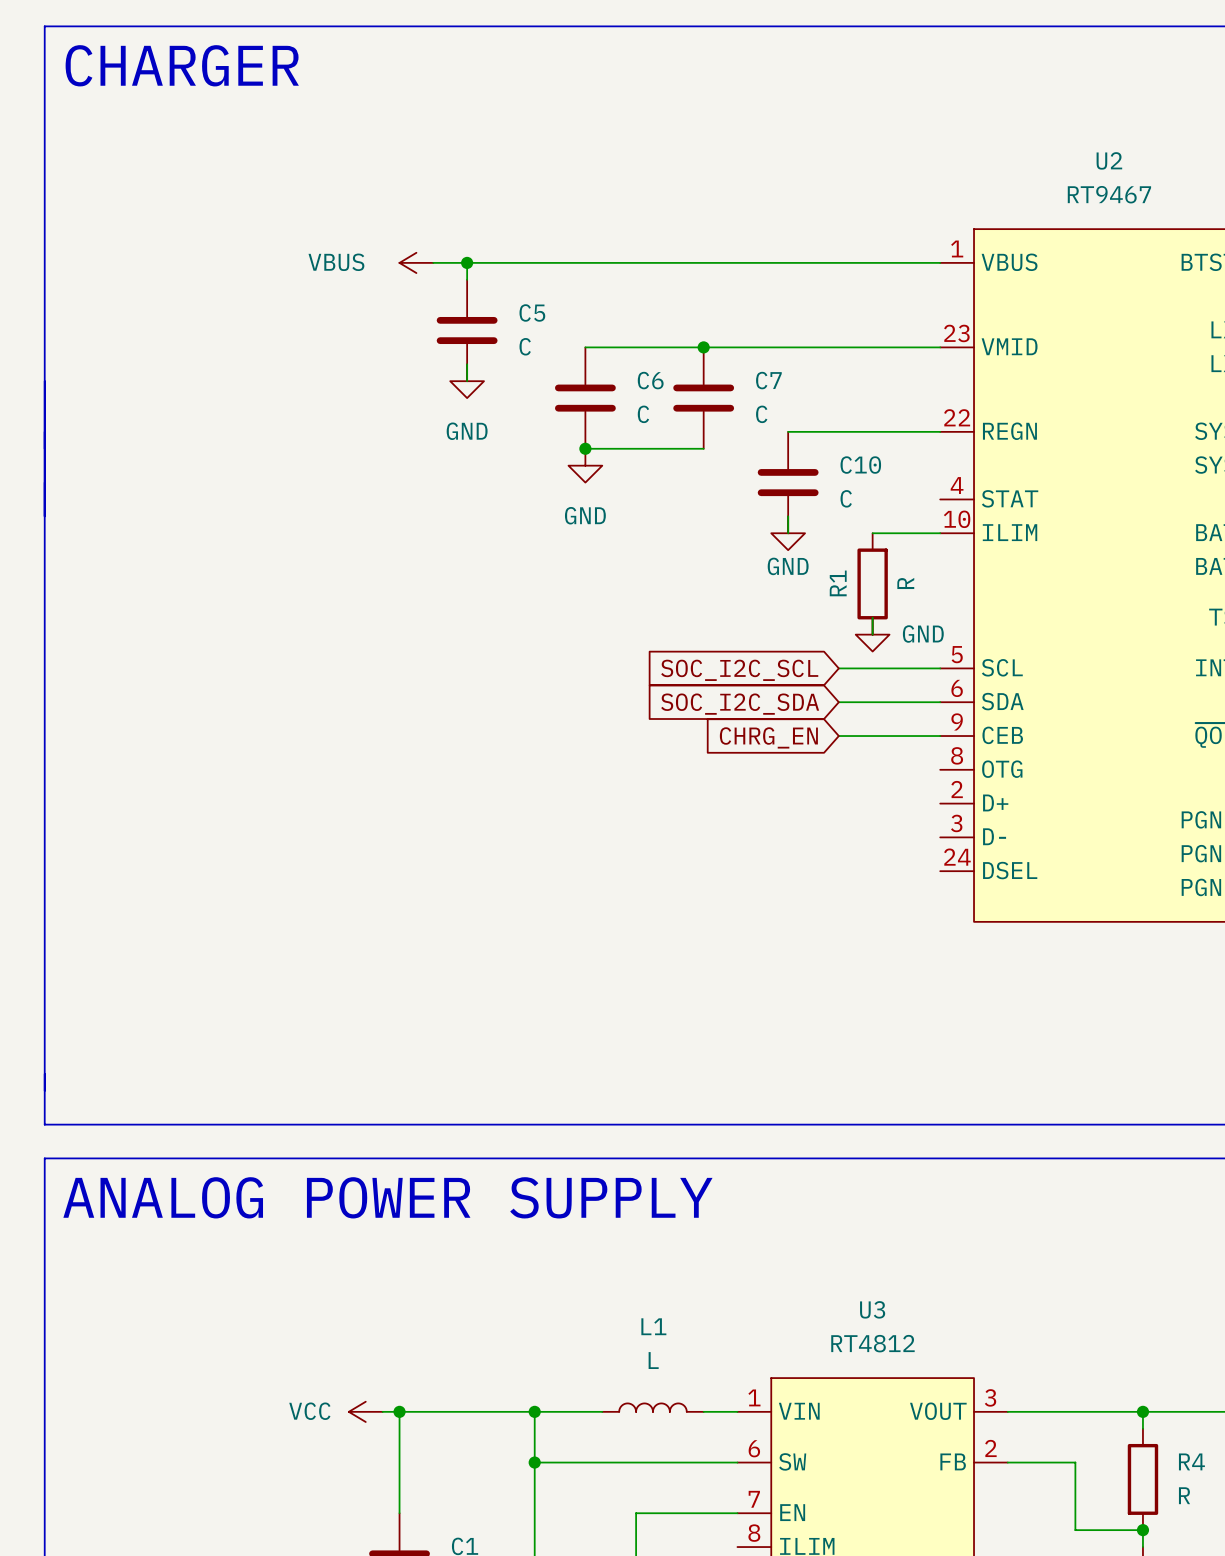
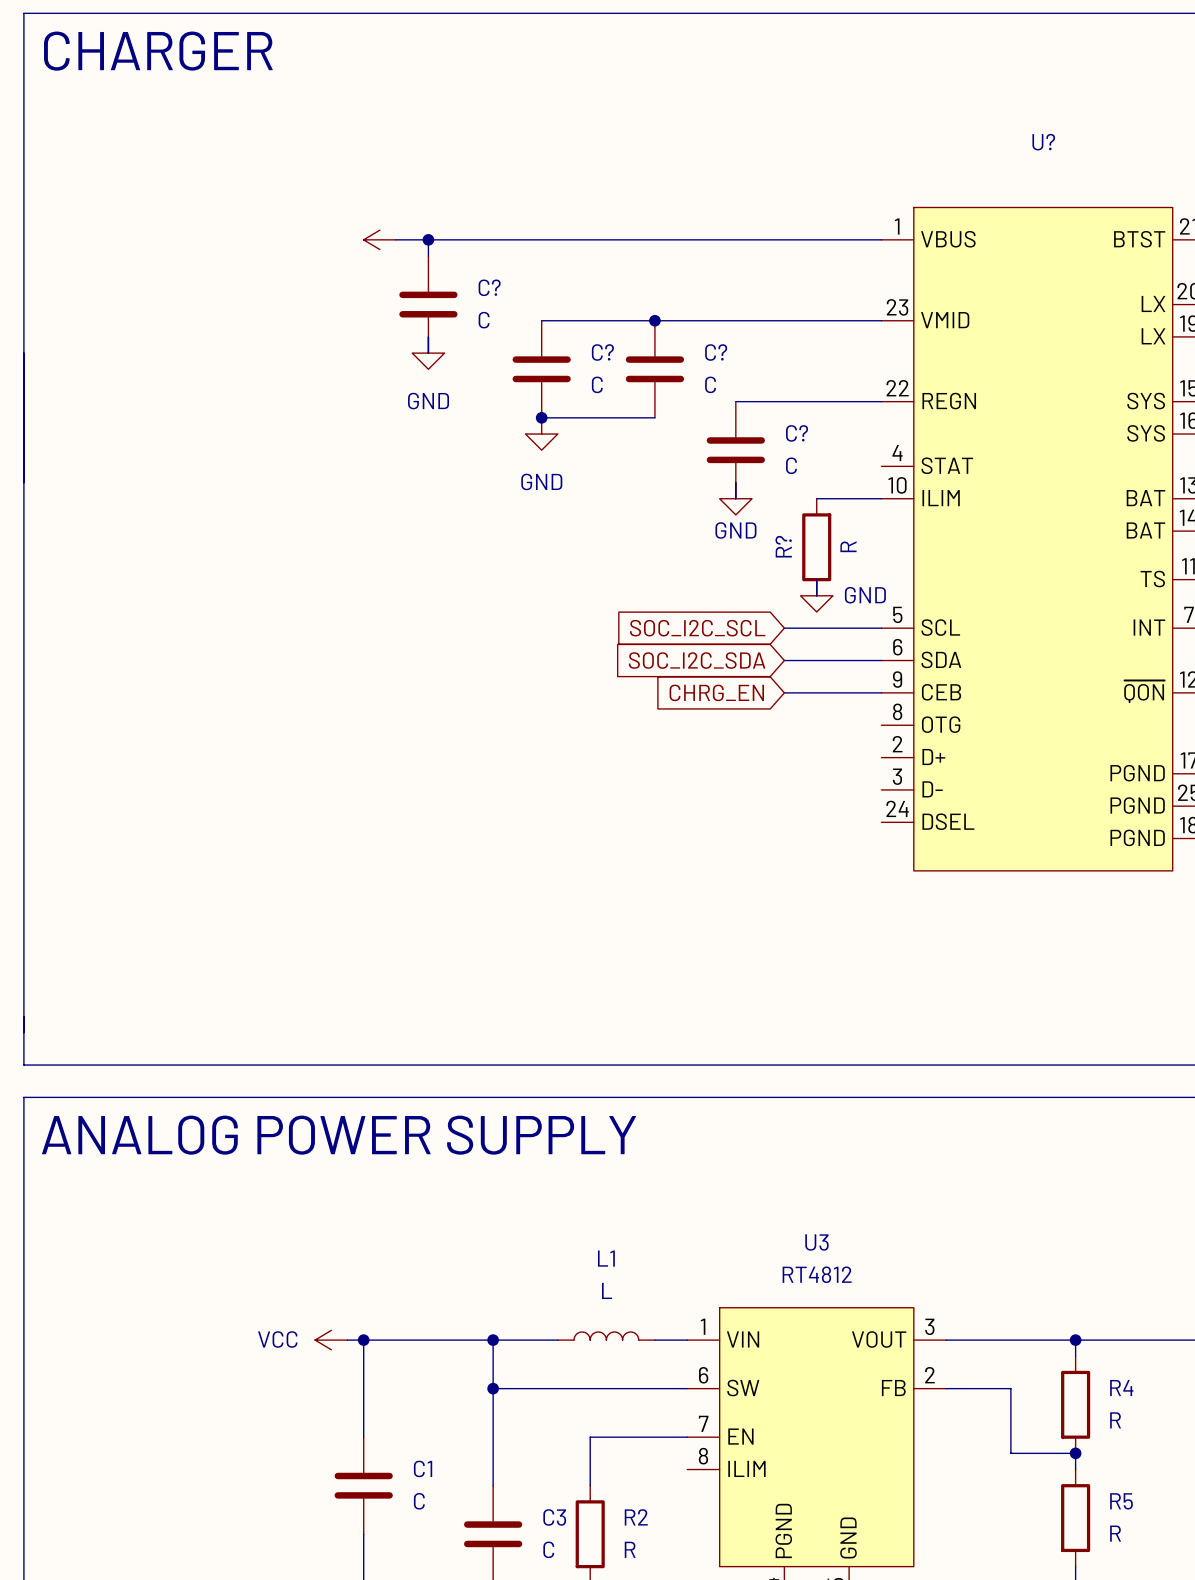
U2 name: U2 (1109, 160) -> U? (1043, 142)
U2 value: RT9467 (1109, 194) -> none
power symbol text: VBUS (336, 262) -> none
C5 name: C5 (532, 312) -> C? (489, 287)
C6 name: C6 (650, 380) -> C? (602, 352)
C7 name: C7 (768, 380) -> C? (716, 352)
C10 name: C10 (860, 465) -> C? (797, 433)
R1 name: R1 (838, 583) -> R? (783, 546)

